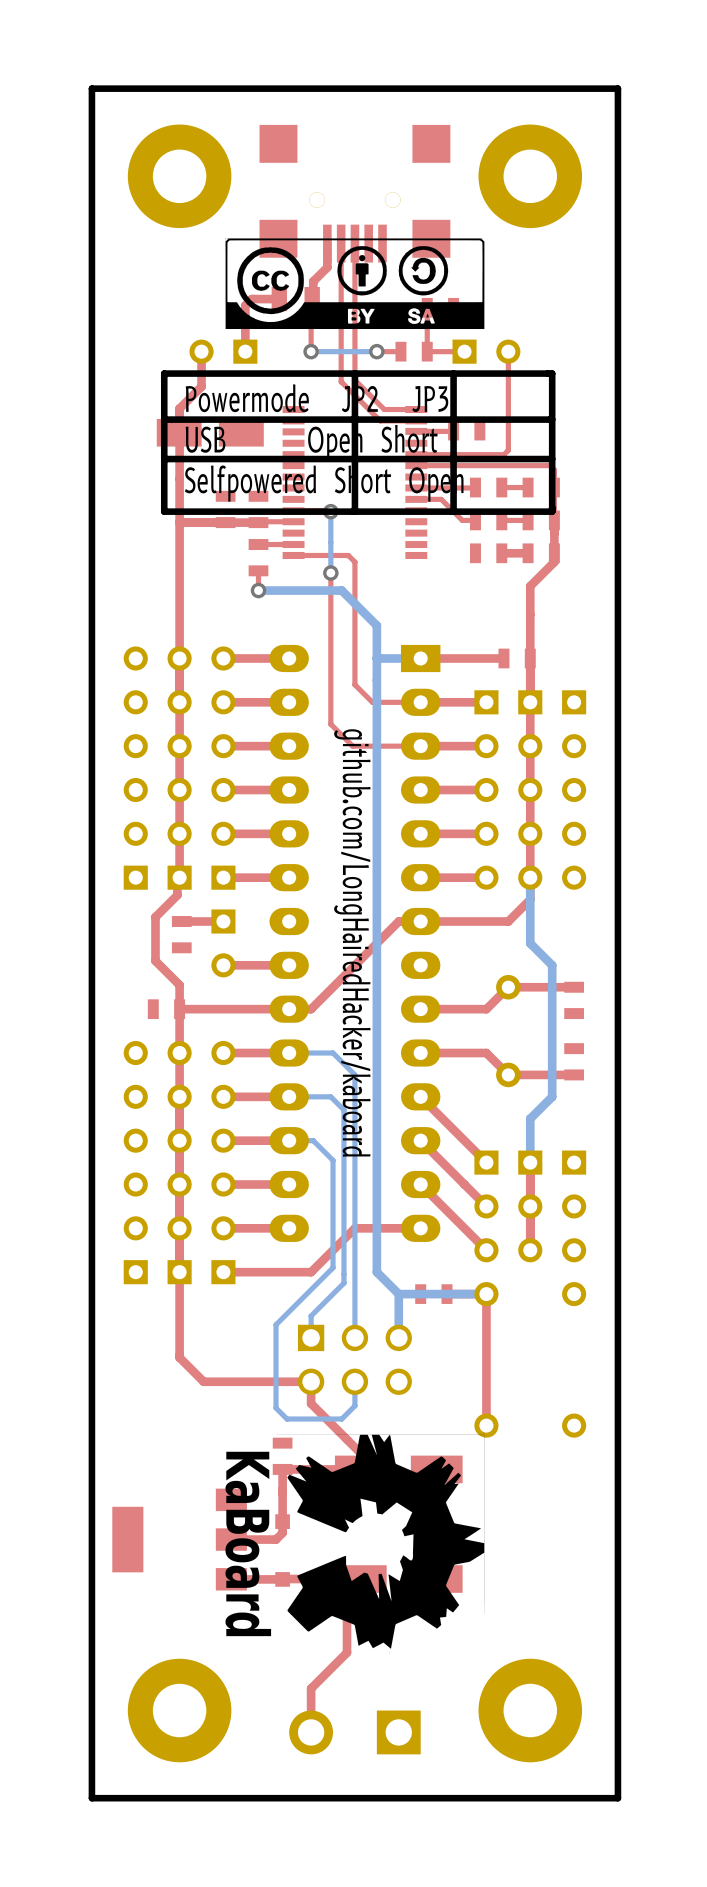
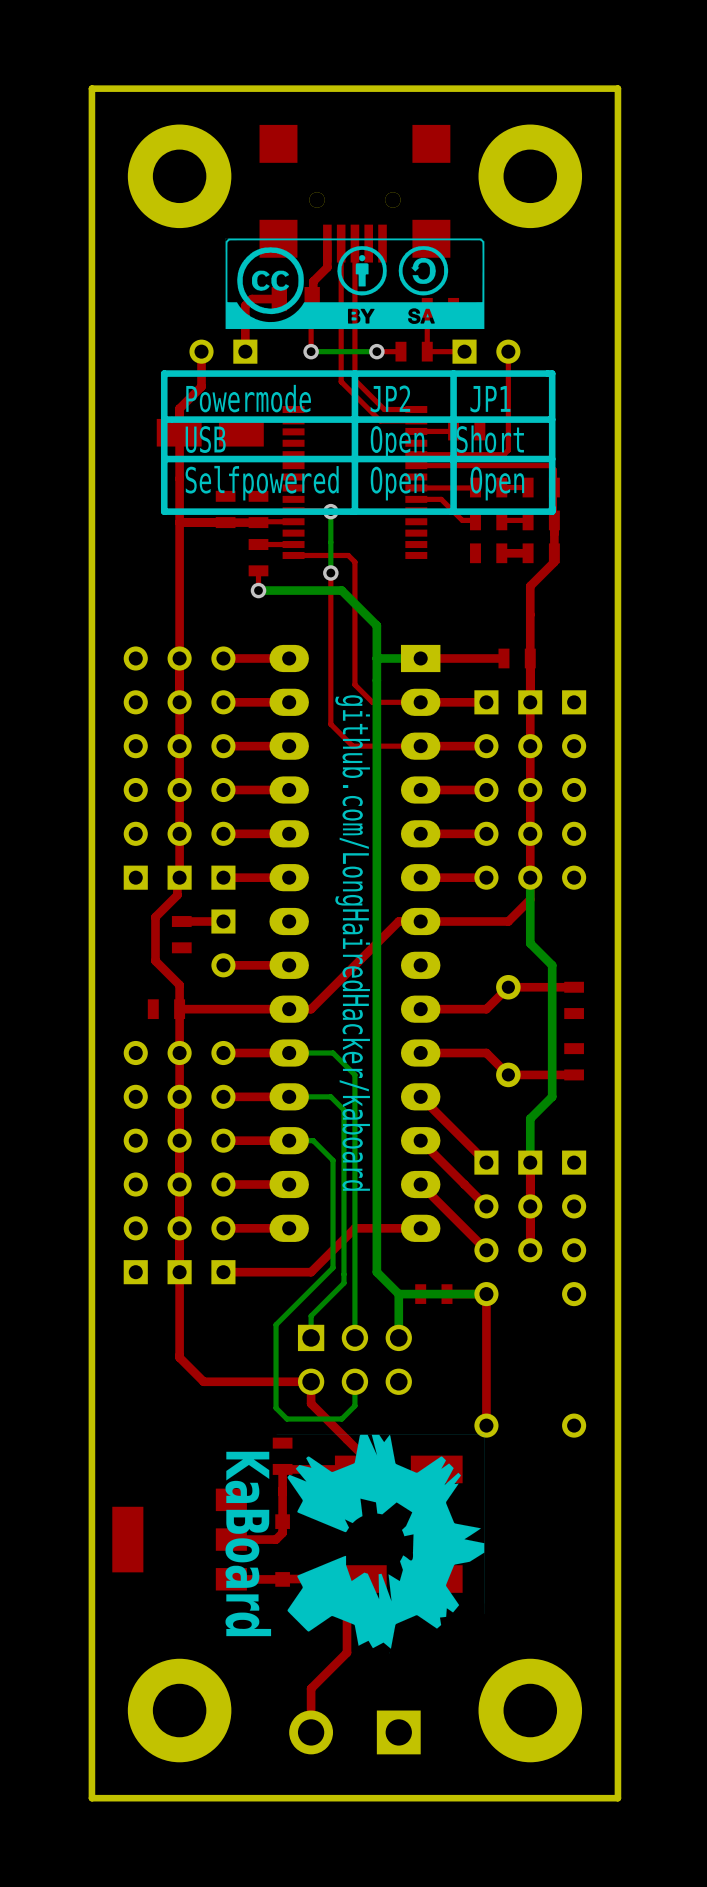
text: Powermode JP2 JP3 (317, 398) -> Powermode JP2 JP1 (348, 398)
text: Selfpowered Short Open (324, 483) -> Selfpowered Open Open (354, 483)

